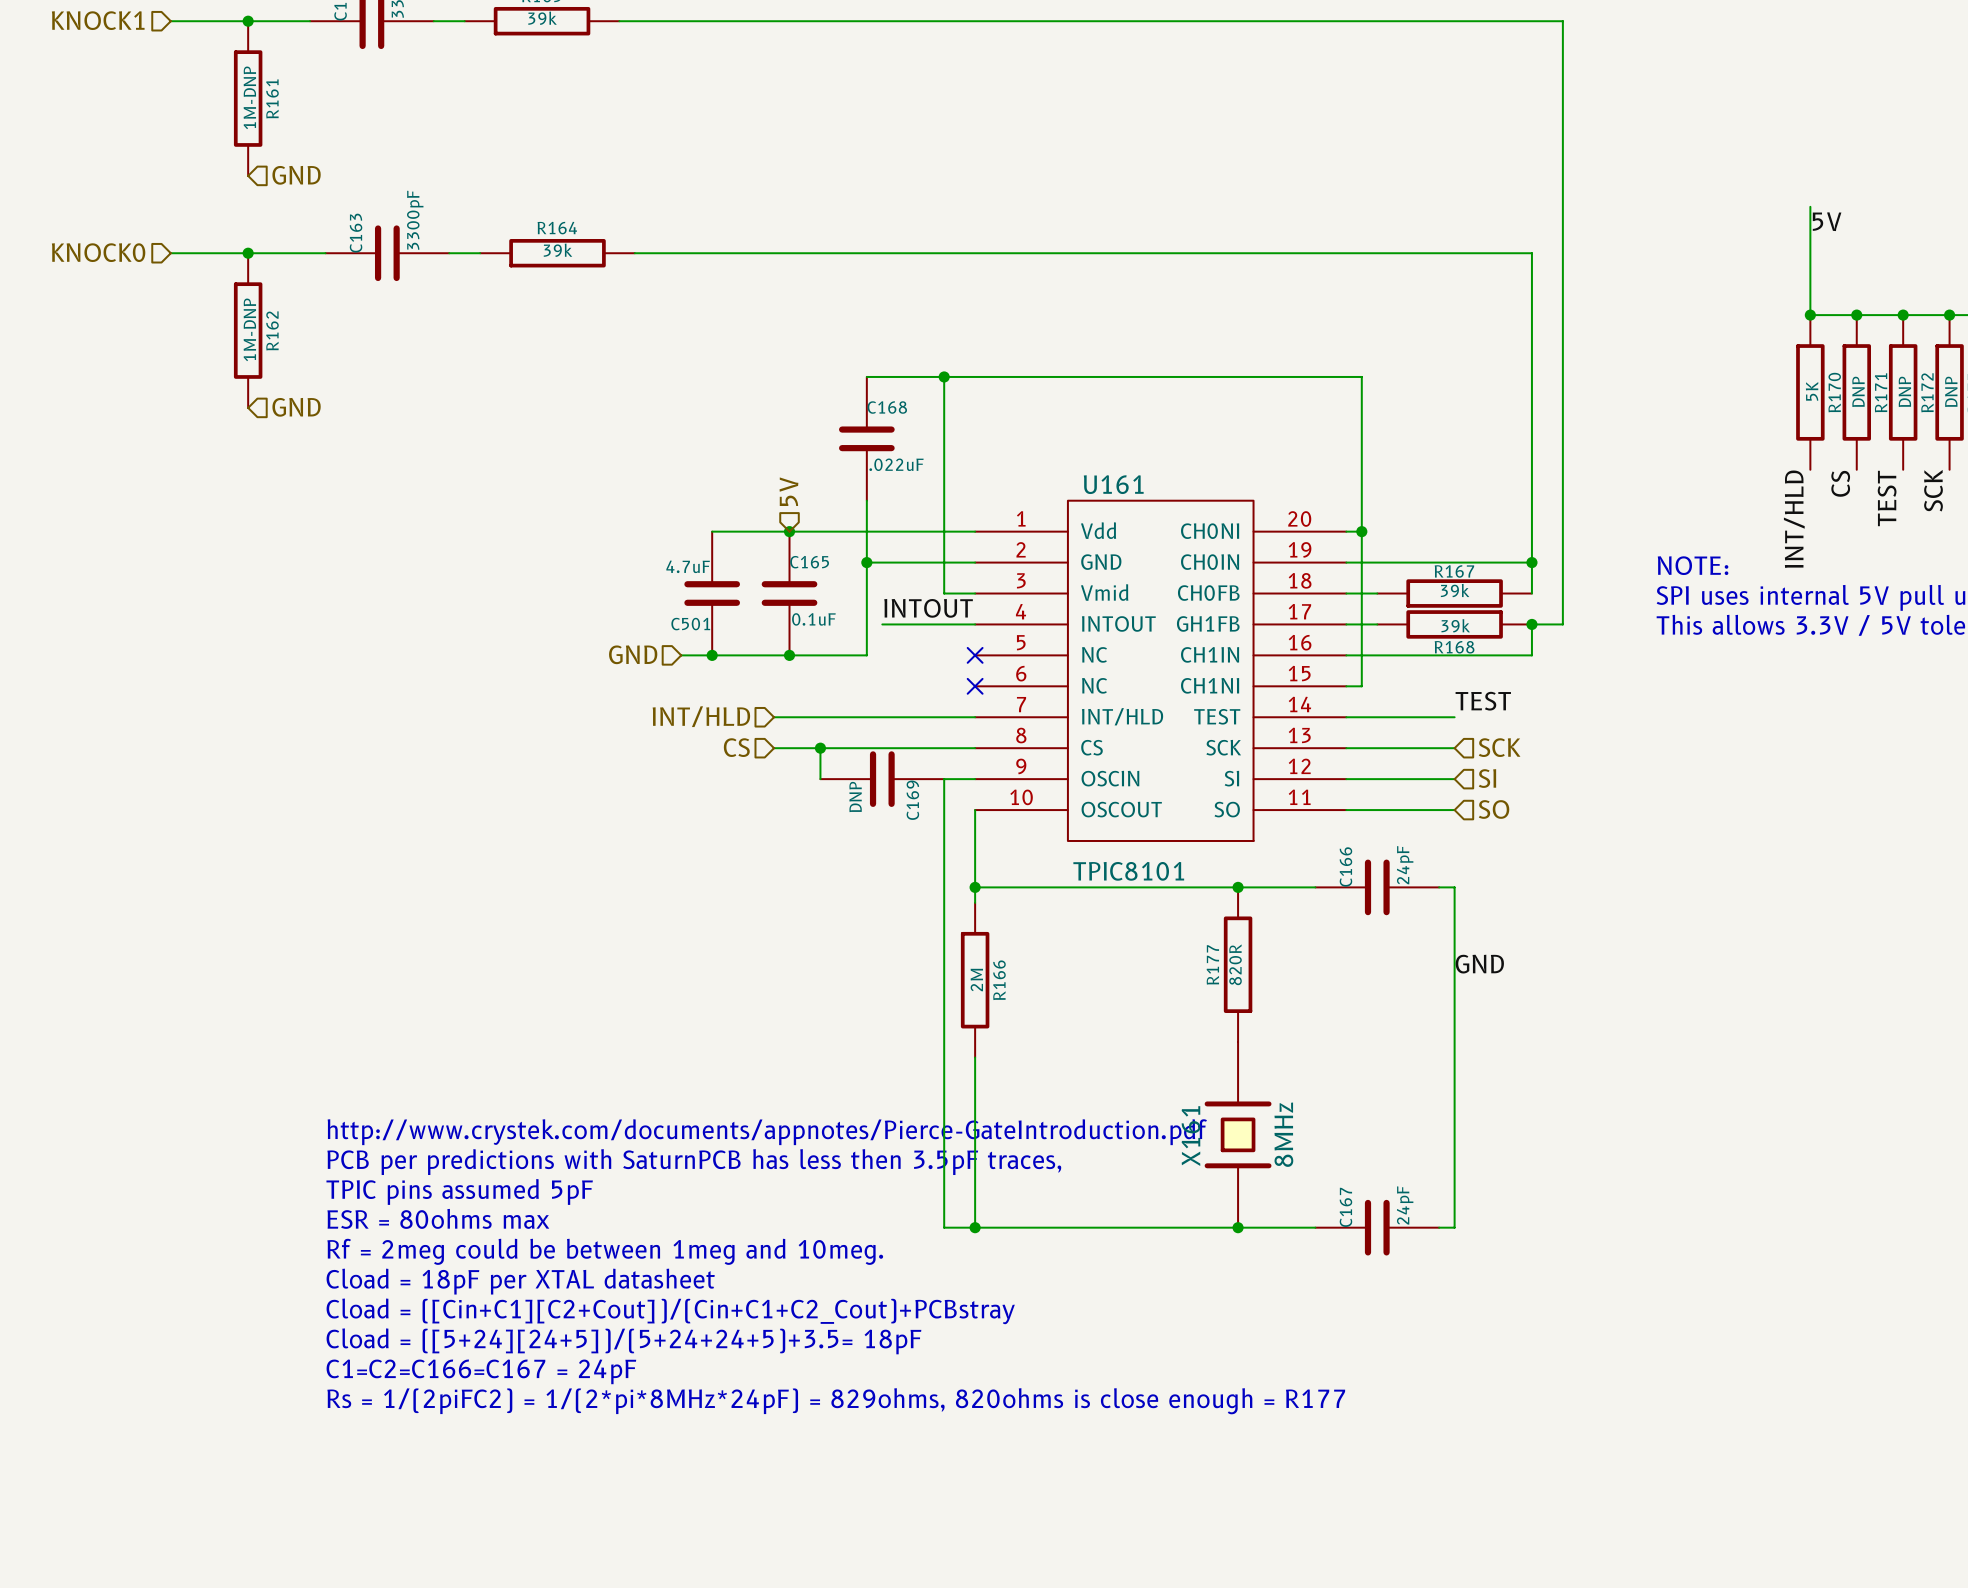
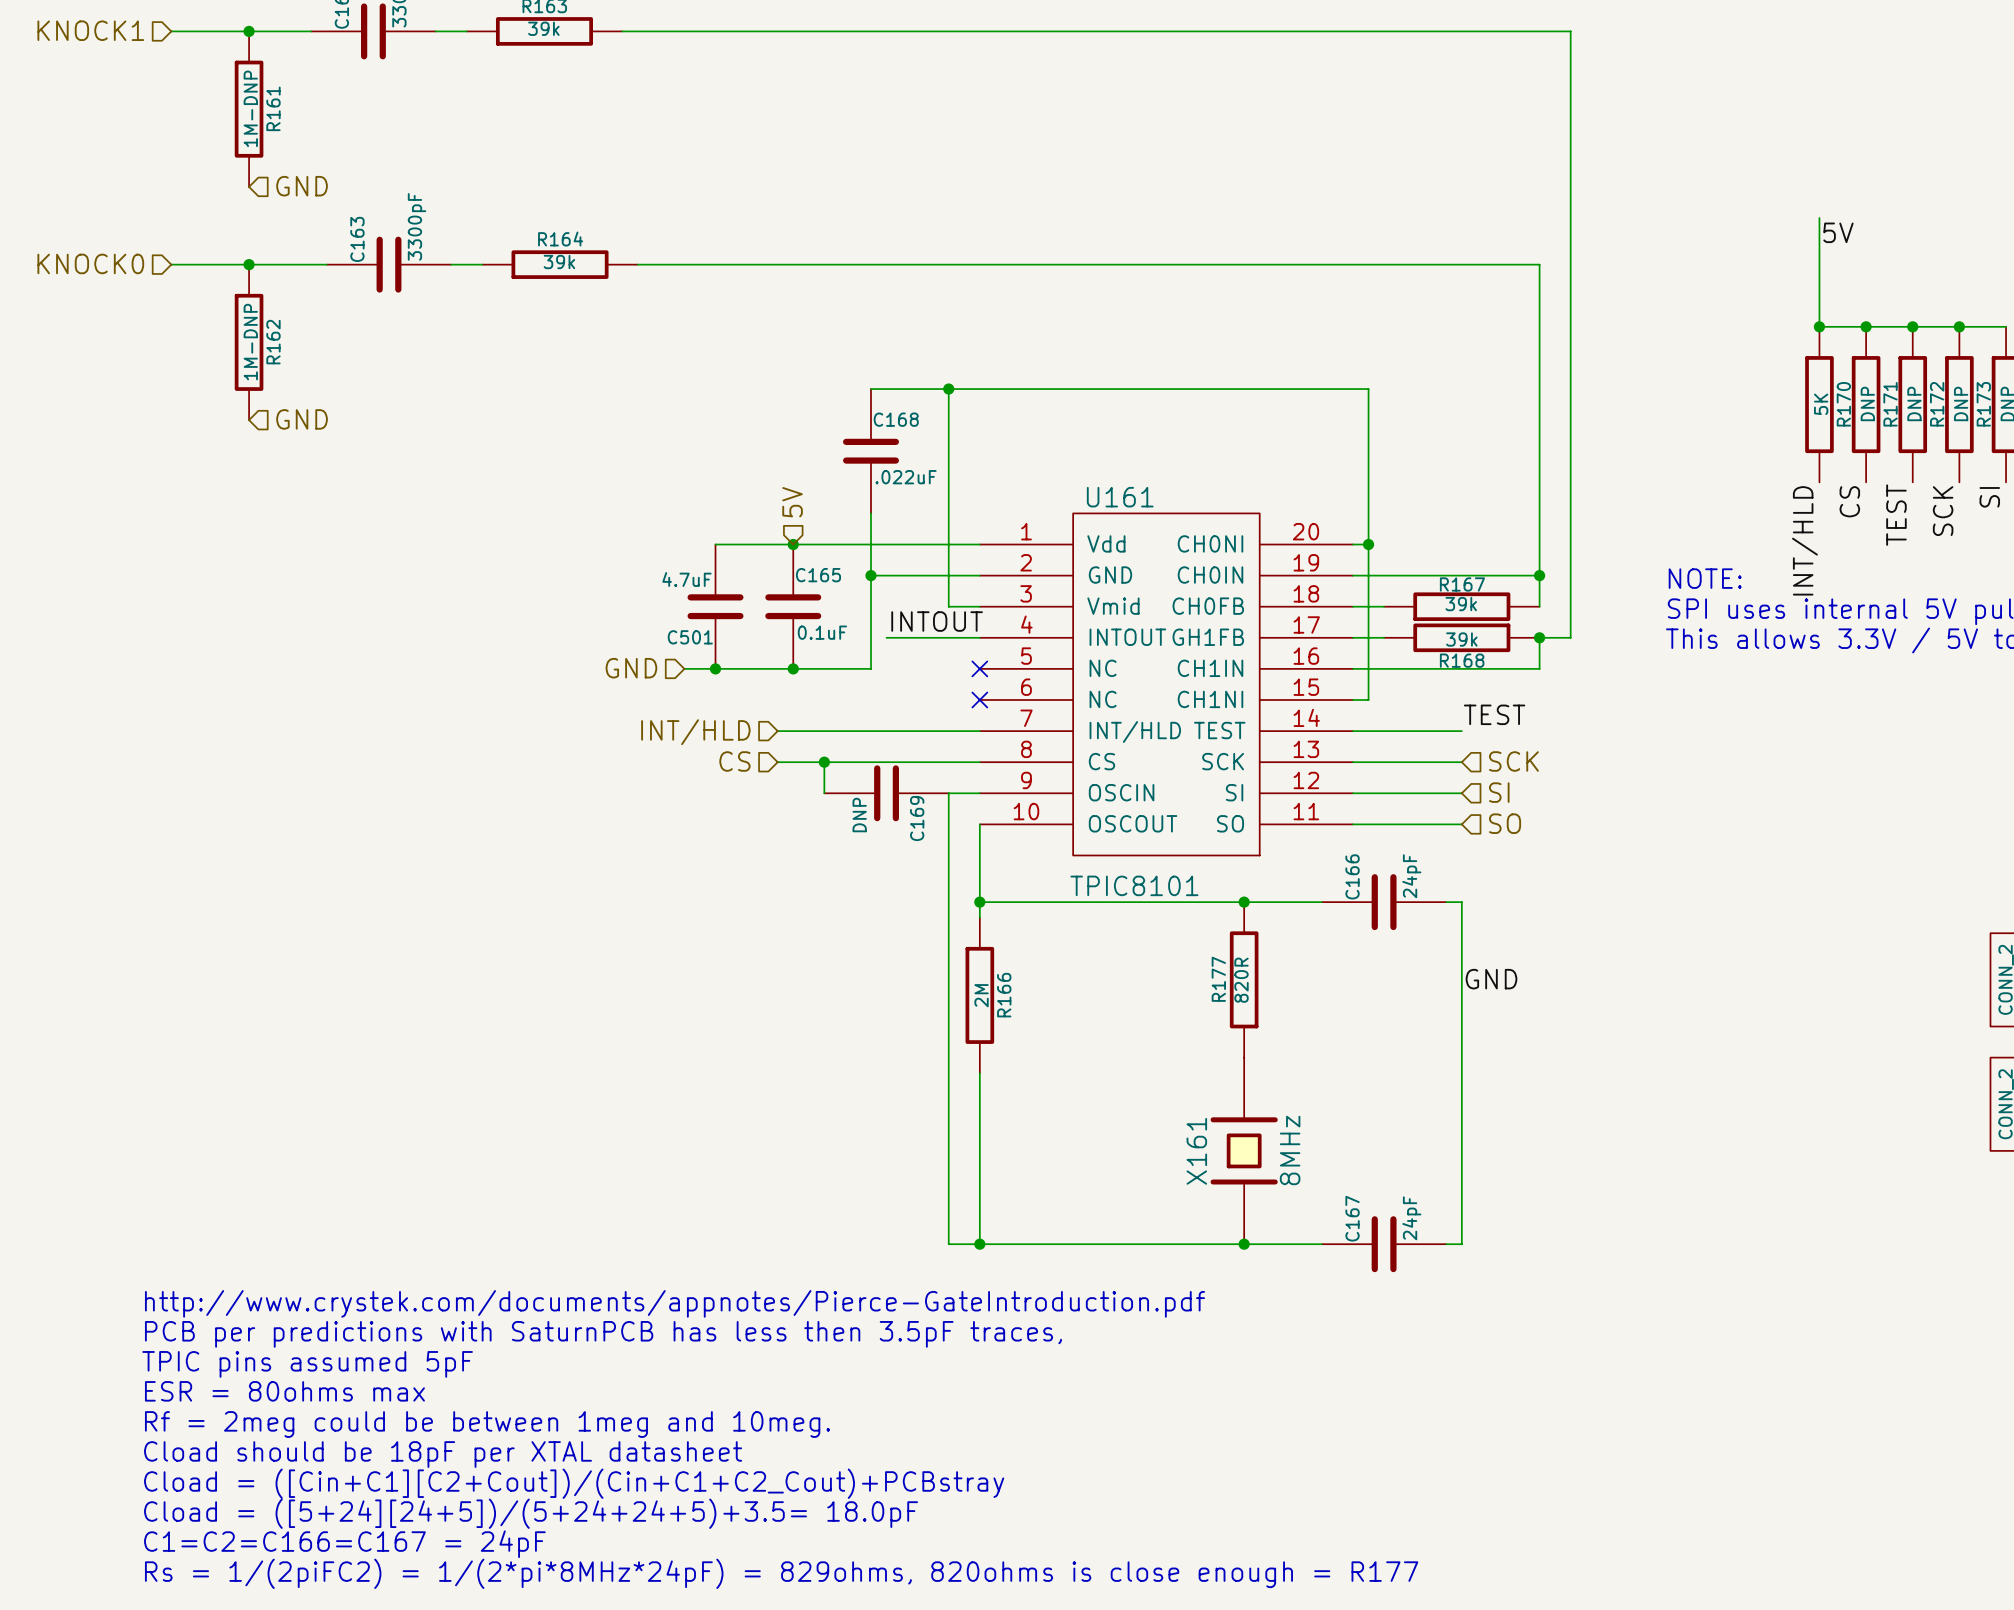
text position: http://www.crystek.com/documents/appnotes/Pierce-GateIntroduction.pdf (767, 1132) -> http://www.crystek.com/documents/appnotes/Pierce-GateIntroduction.pdf (674, 1303)
text position: PCB per predictions with SaturnPCB has less then 3.5pF traces, (694, 1162) -> PCB per predictions with SaturnPCB has less then 3.5pF traces, (603, 1334)
text position: TPIC pins assumed 5pF (459, 1191) -> TPIC pins assumed 5pF (307, 1364)
text position: ESR = 80ohms max (438, 1218) -> ESR = 80ohms max (284, 1391)
text position: Rf = 2meg could be between 1meg and 10meg. (605, 1251) -> Rf = 2meg could be between 1meg and 10meg. (487, 1424)
text: Cload = 18pF per XTAL datasheet (520, 1281) -> none
text position: Cload = ([Cin+C1][C2+Cout])/(Cin+C1+C2_Cout)+PCBstray (670, 1311) -> Cload = ([Cin+C1][C2+Cout])/(Cin+C1+C2_Cout)+PCBstray (574, 1483)
text: Cload = ([5+24][24+5])/(5+24+24+5)+3.5= 18pF (623, 1341) -> none
text position: C1=C2=C166=C167 = 24pF (481, 1371) -> C1=C2=C166=C167 = 24pF (344, 1544)
text position: Rs = 1/(2piFC2) = 1/(2*pi*8MHz*24pF) = 829ohms, 820ohms is close enough = R177 (836, 1401) -> Rs = 1/(2piFC2) = 1/(2*pi*8MHz*24pF) = 829ohms, 820ohms is close enough = R177 (781, 1573)
text: none -> Cload should be 18pF per XTAL datasheet (443, 1454)
text: none -> Cload = ([5+24][24+5])/(5+24+24+5)+3.5= 18.0pF (531, 1513)

